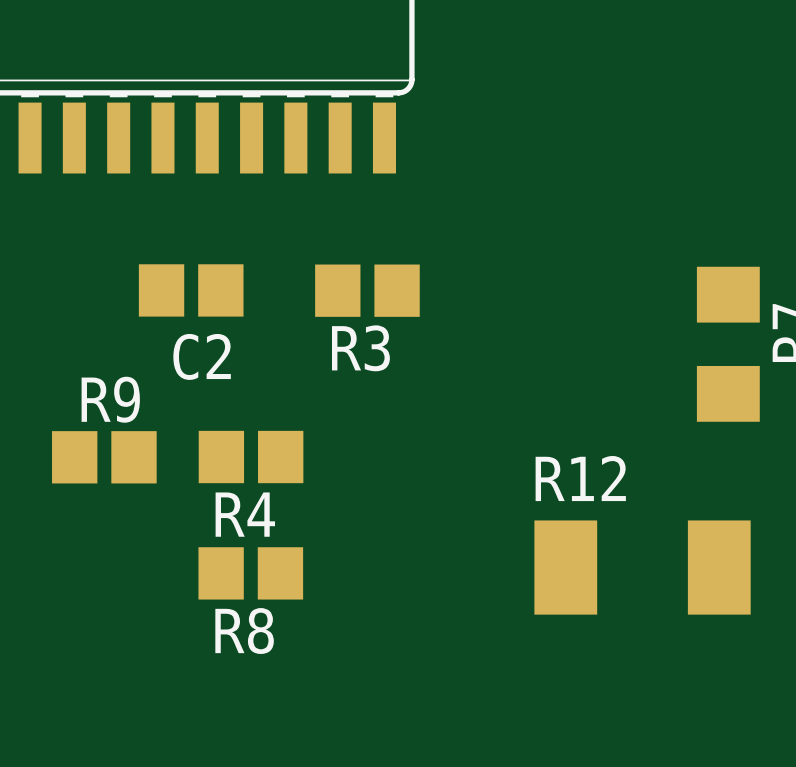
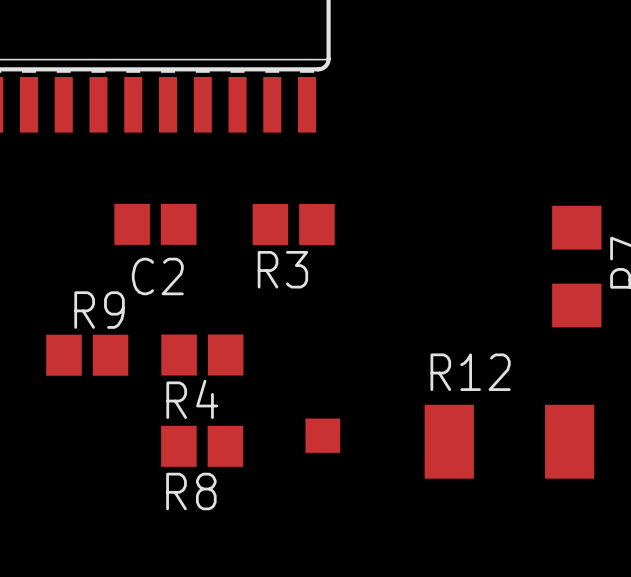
part: none -> (322, 435)

